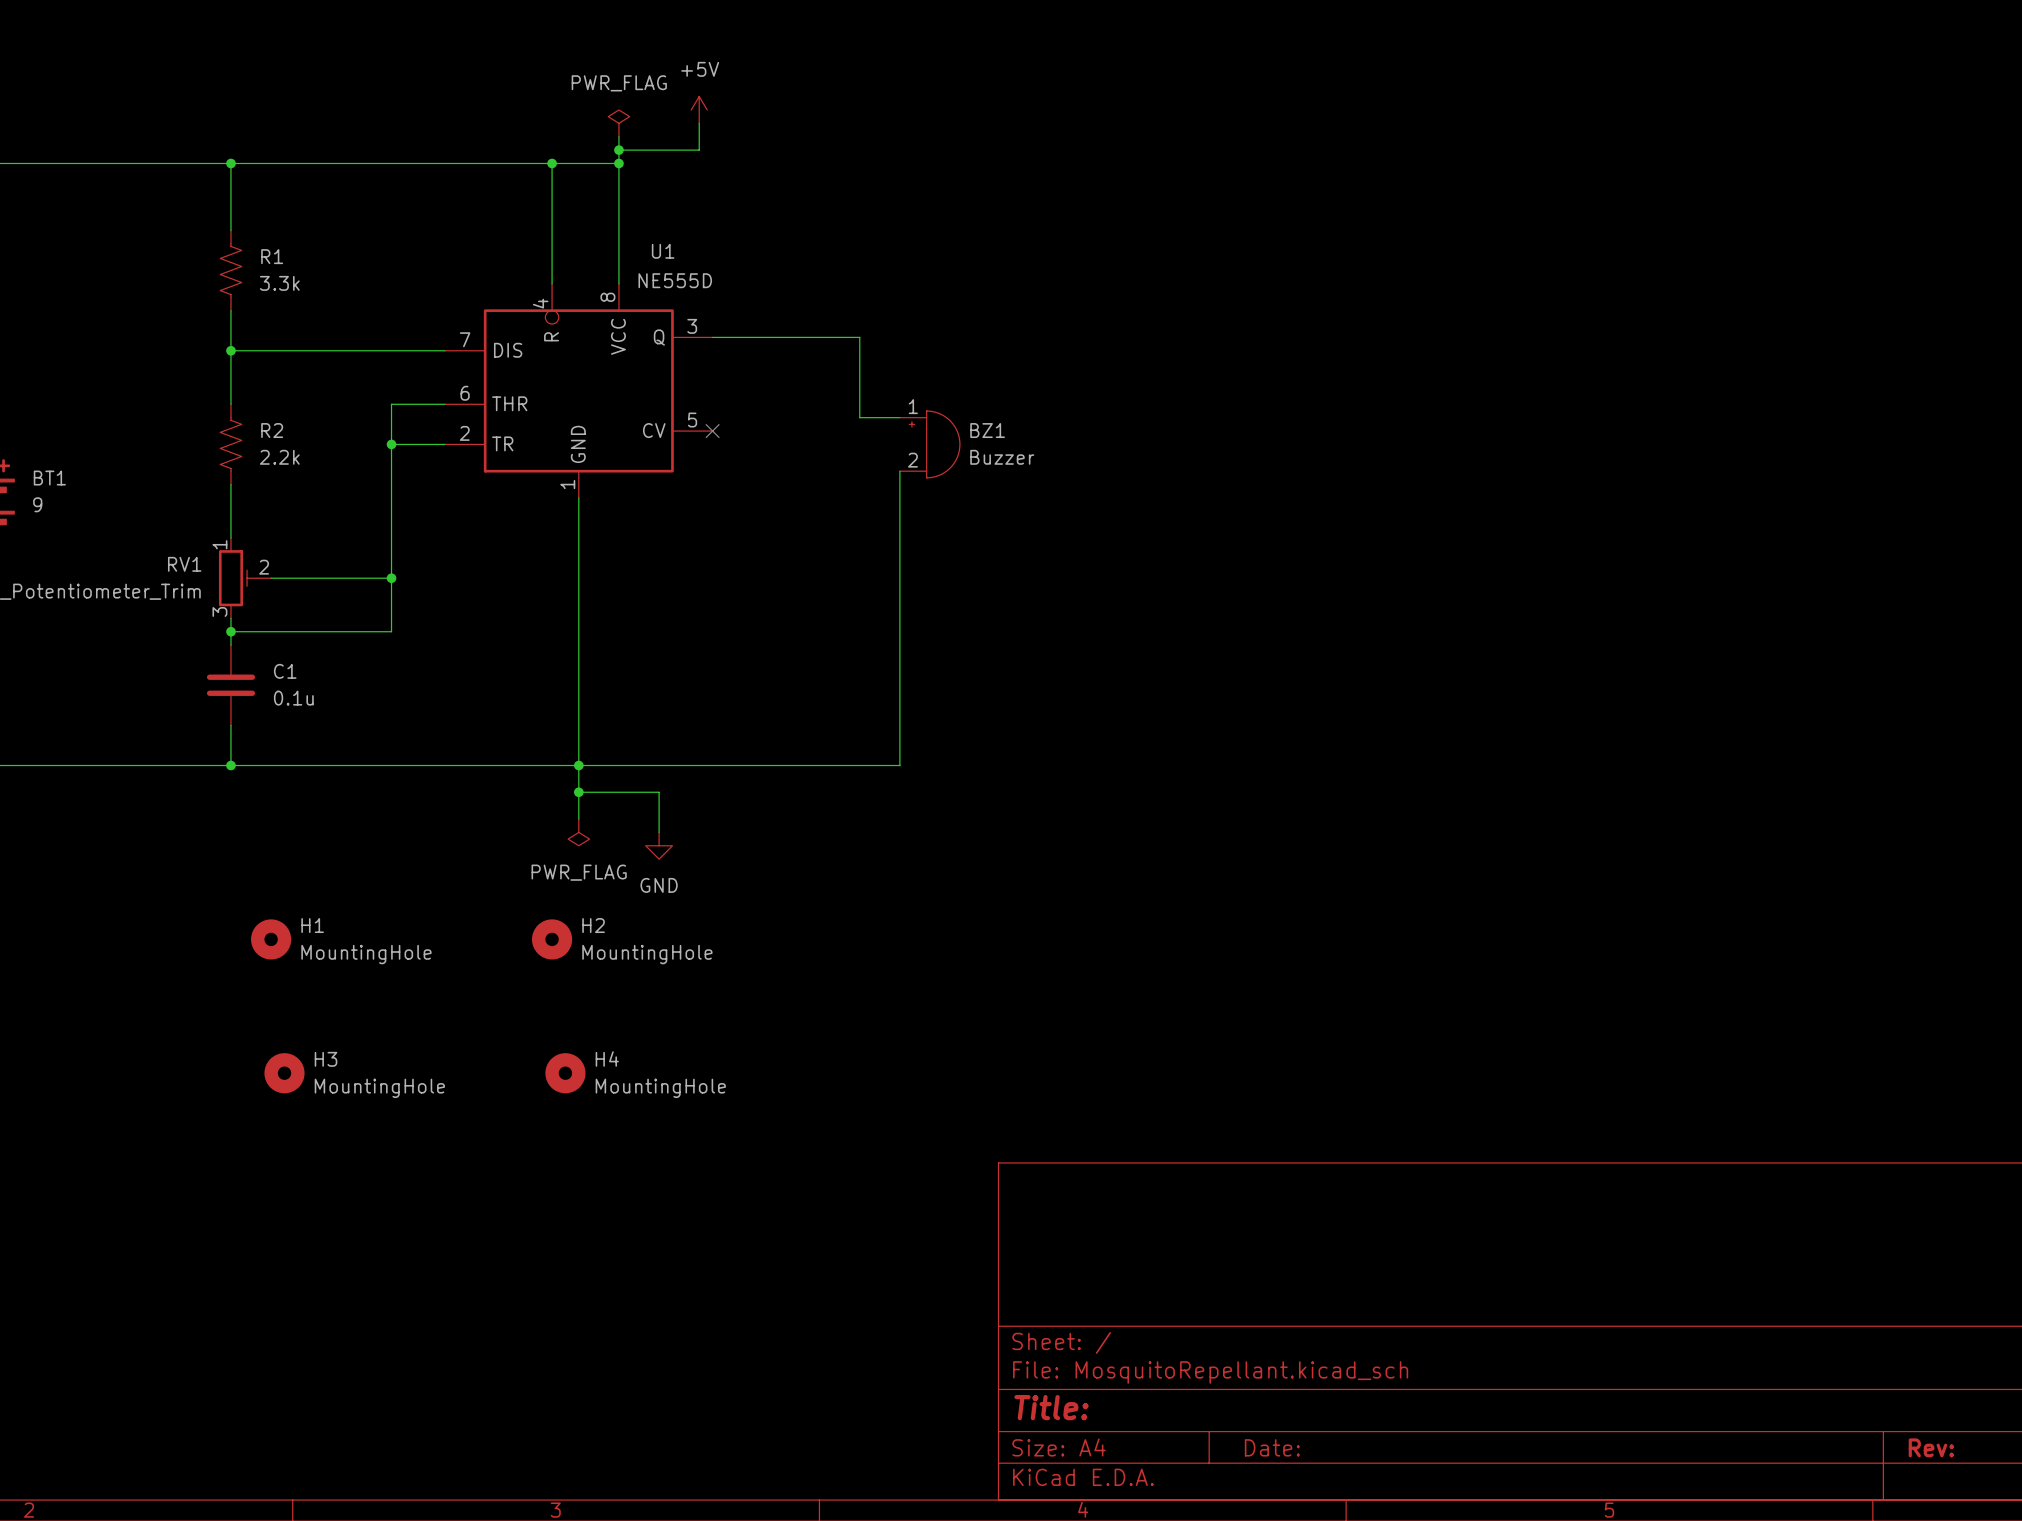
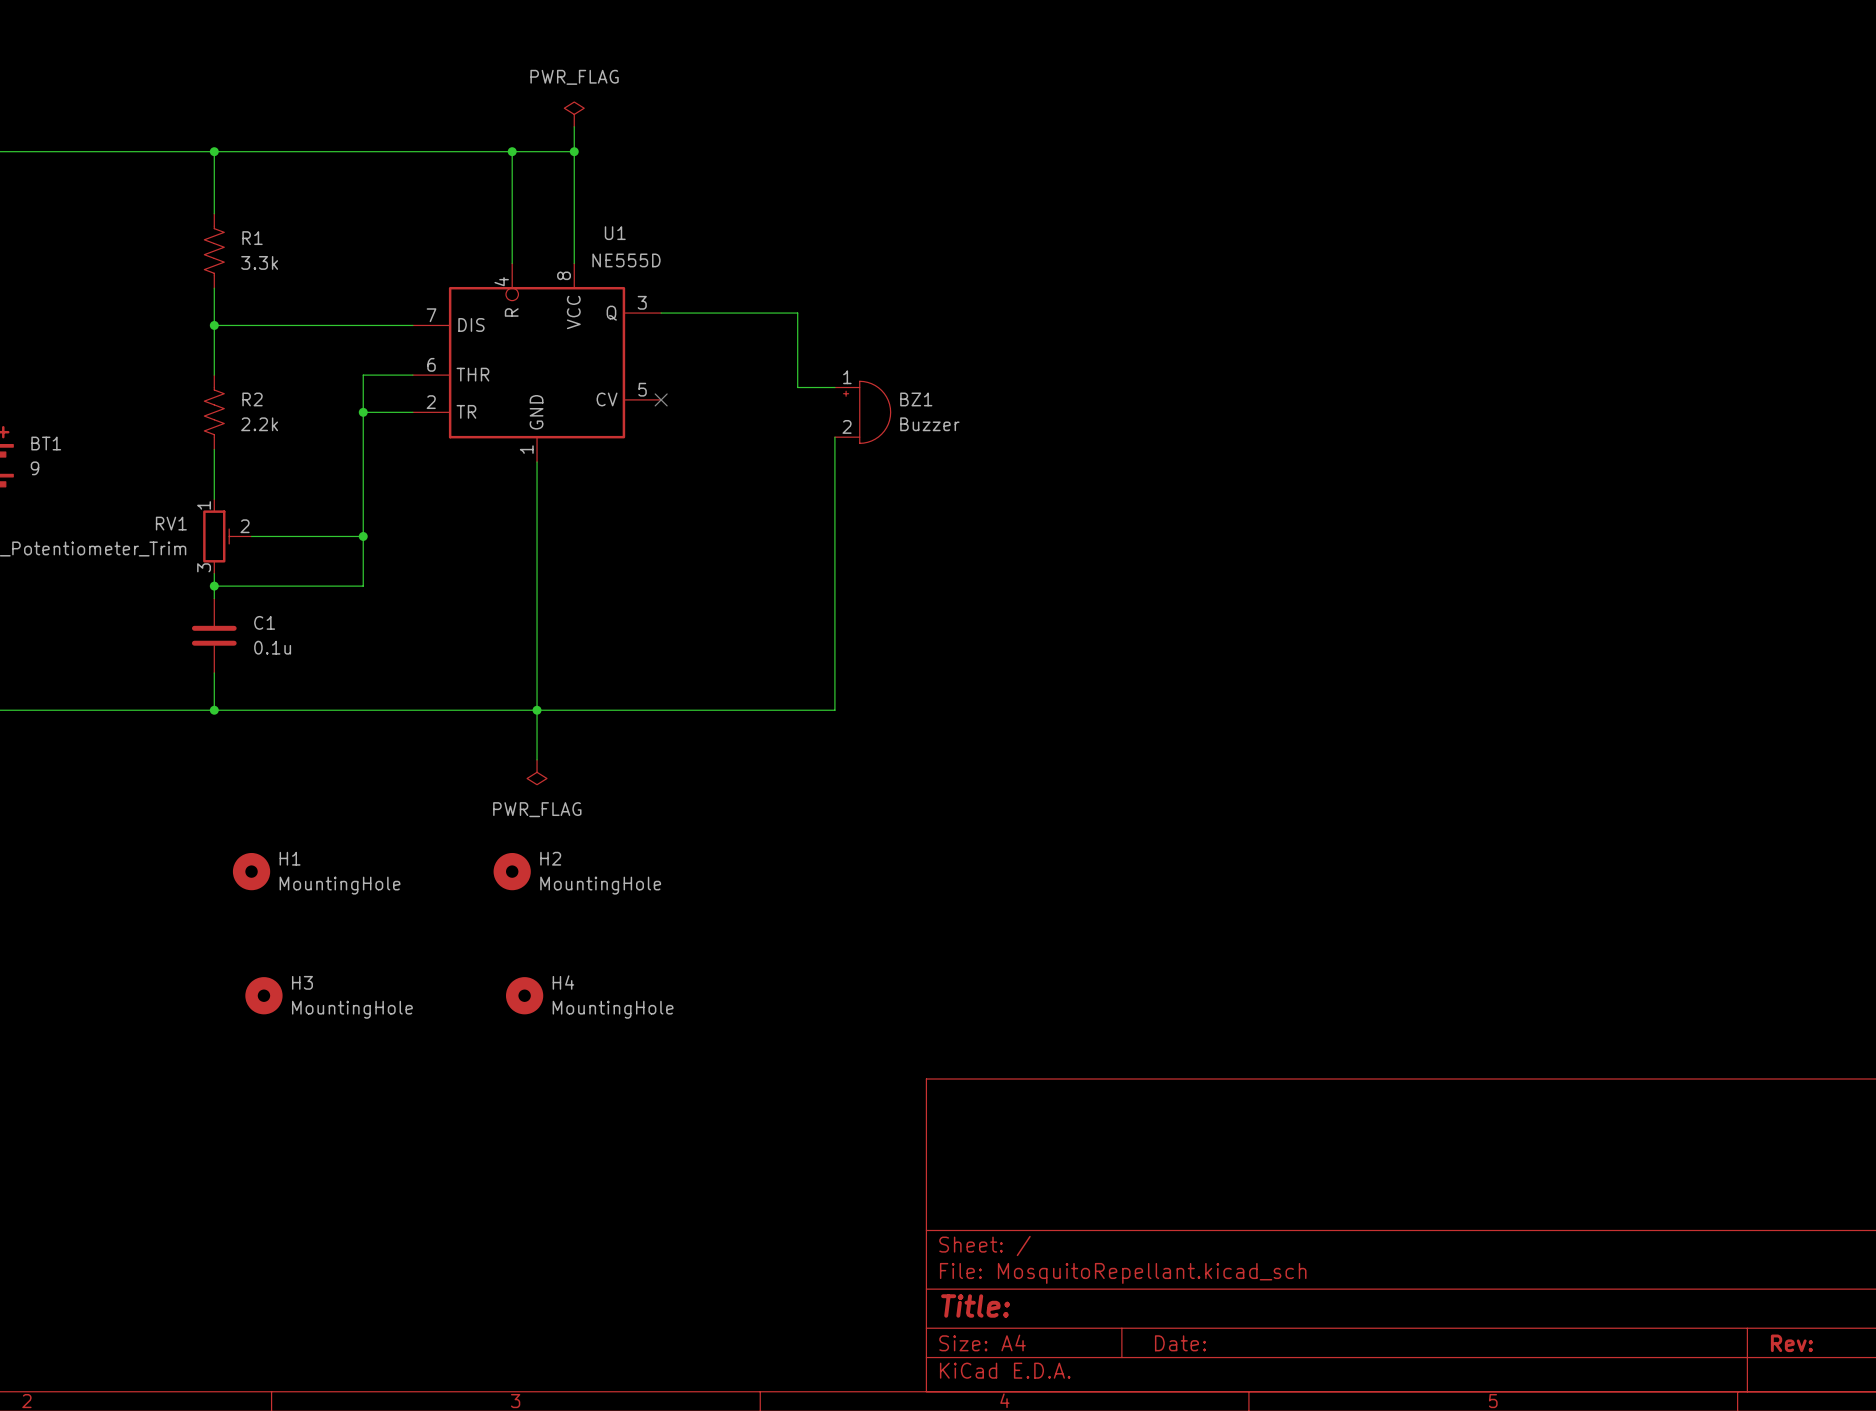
power symbol: +5V (699, 109) -> none
wire: (699, 123) (699, 150) (618, 150) -> none
junction: (618, 150) -> none
wire: (578, 792) (659, 792) (659, 832) -> none
junction: (578, 792) -> none
power symbol: GND (659, 845) -> none

